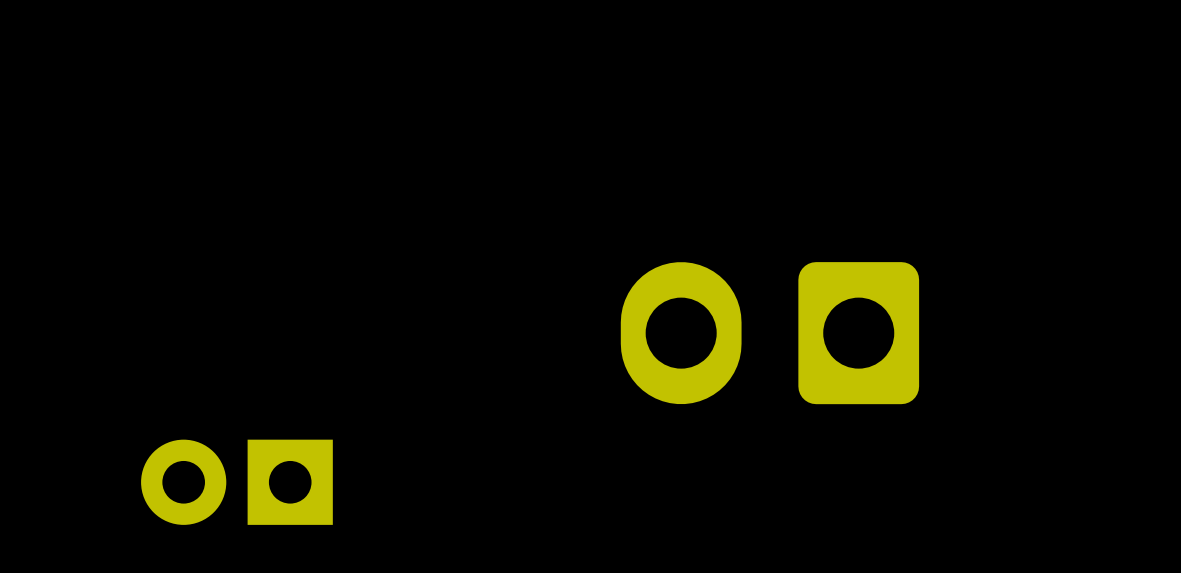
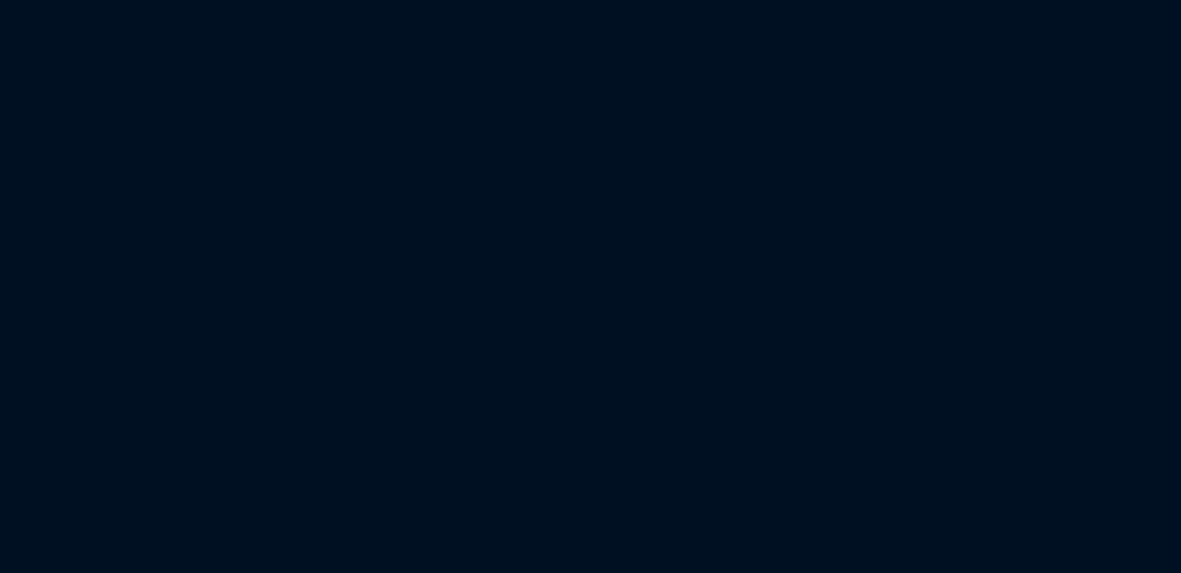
part: (769, 333) -> none
part: (236, 482) -> none

